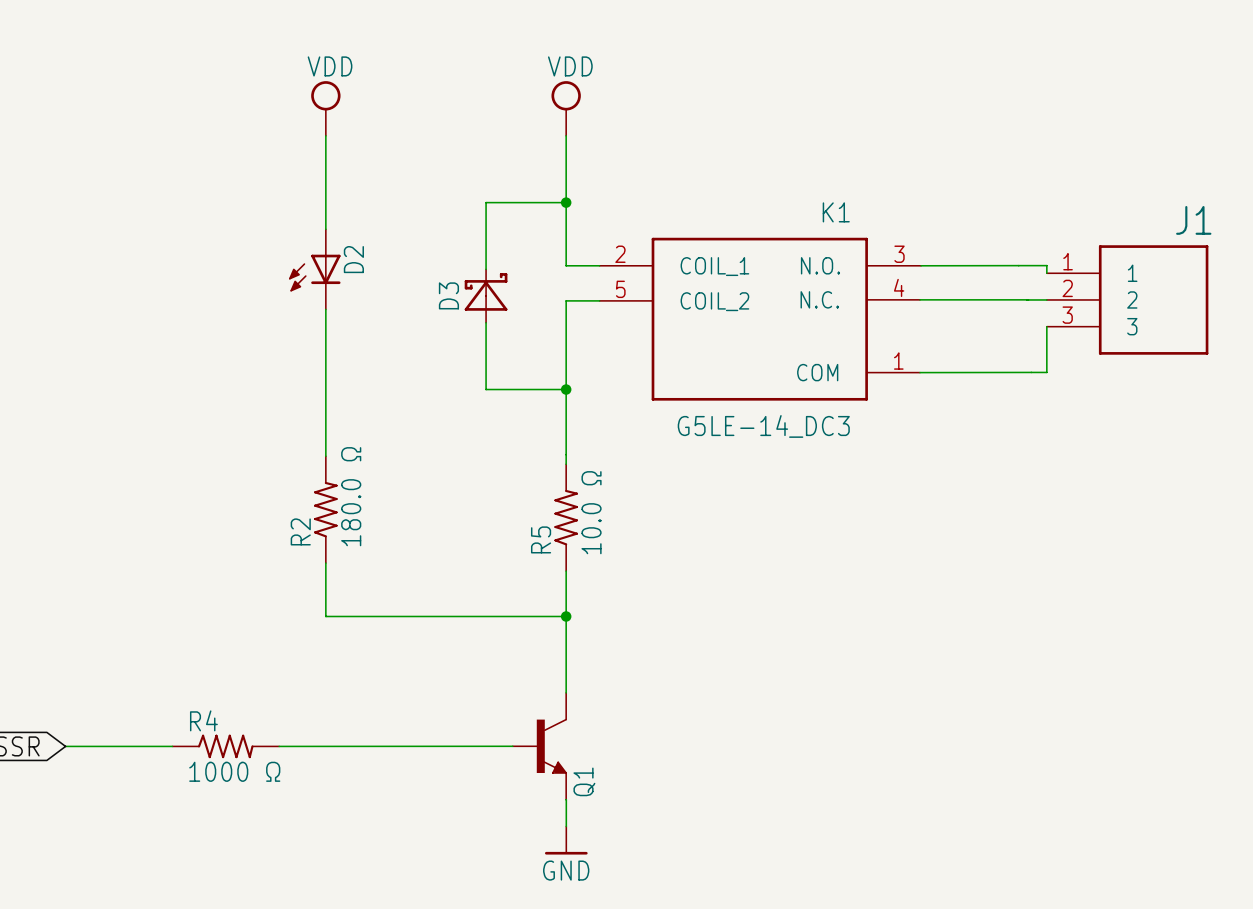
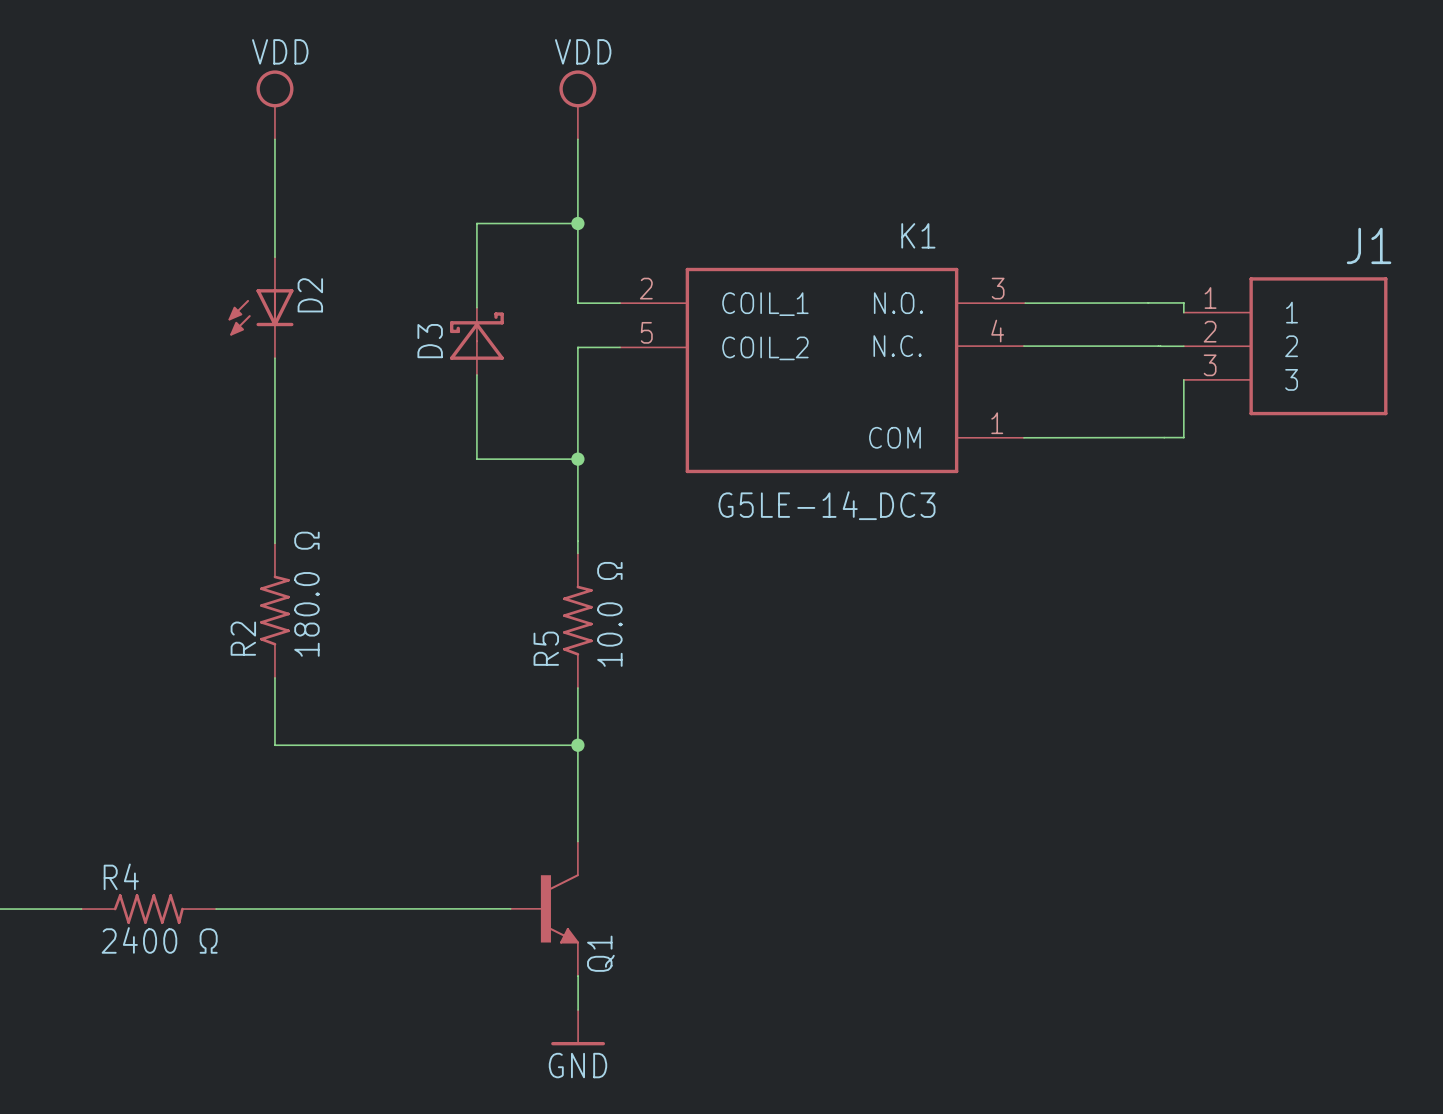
R4 value: 1000 Ω (234, 771) -> 2400 Ω (159, 940)

